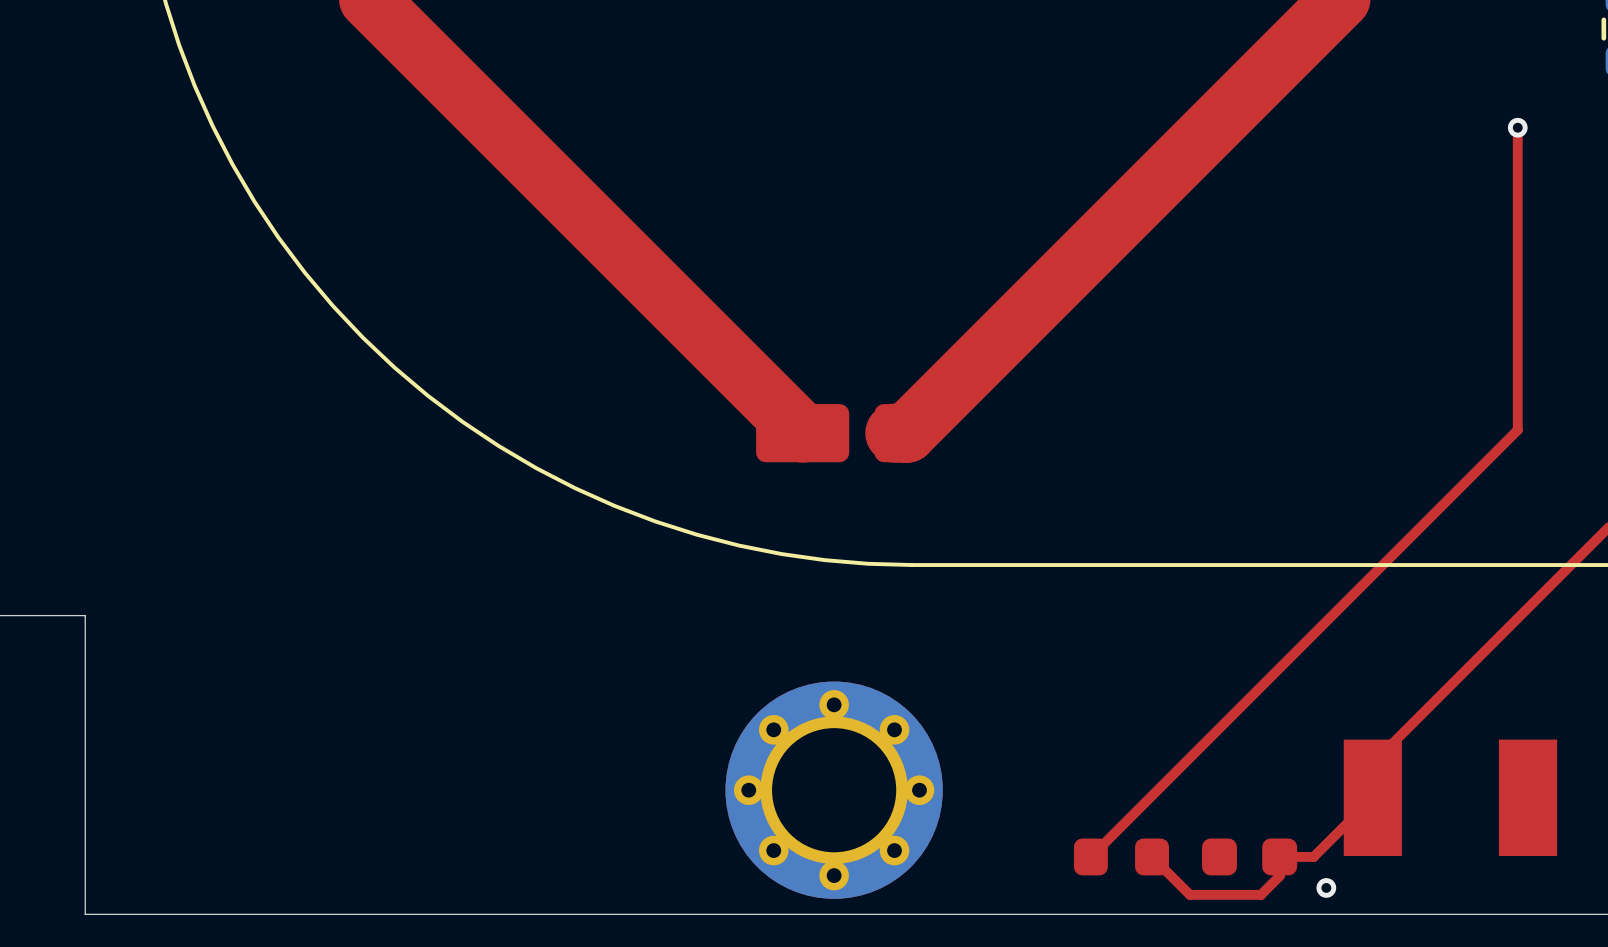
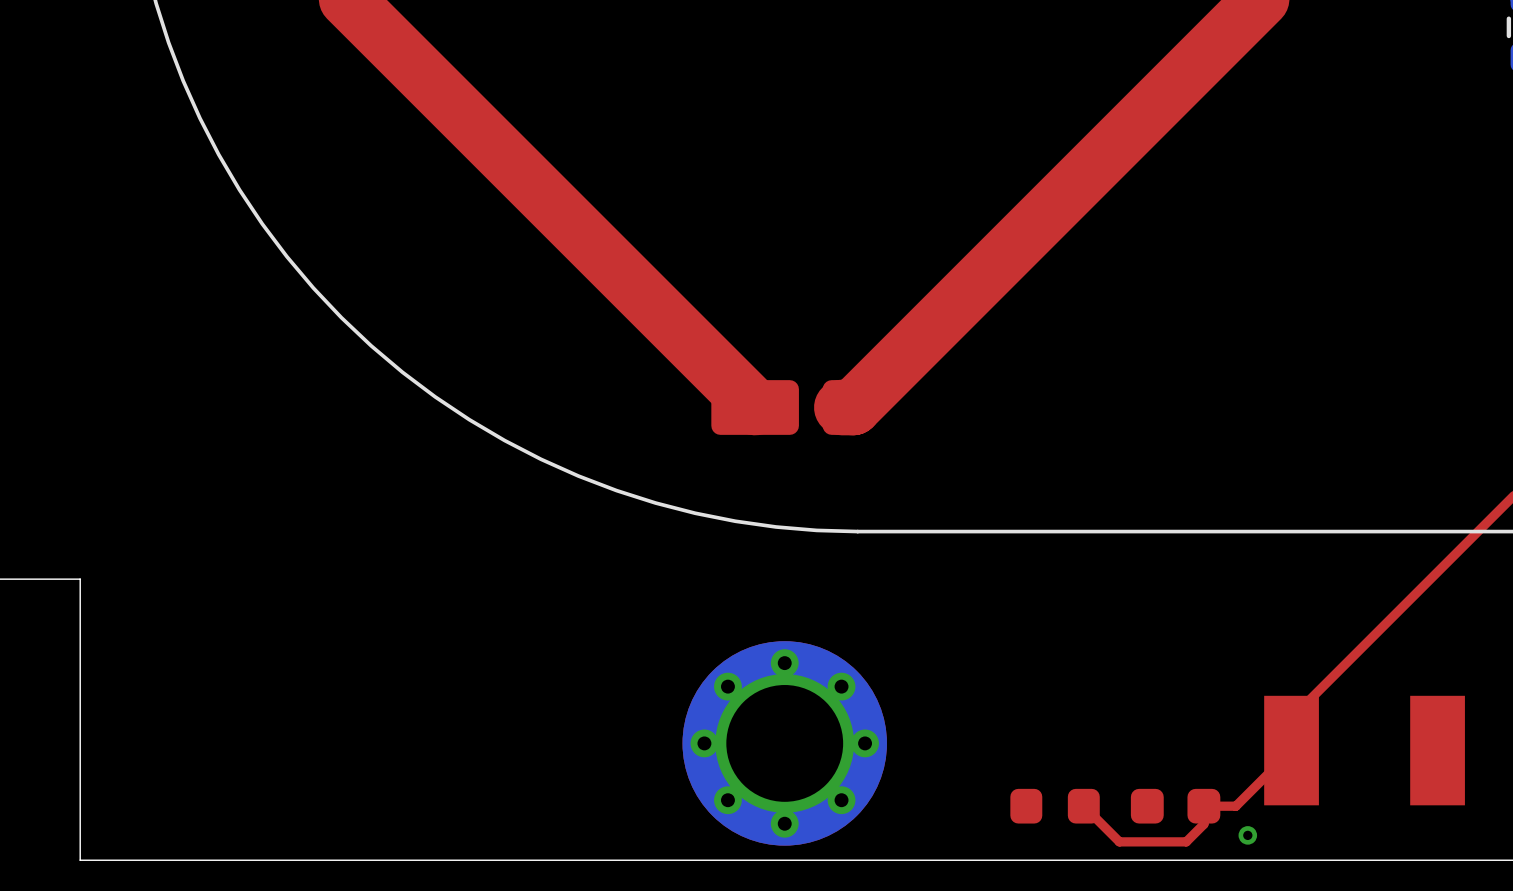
top track: (1517, 127) (1517, 430) (1090, 856) -> none
via: (1517, 127) -> none

